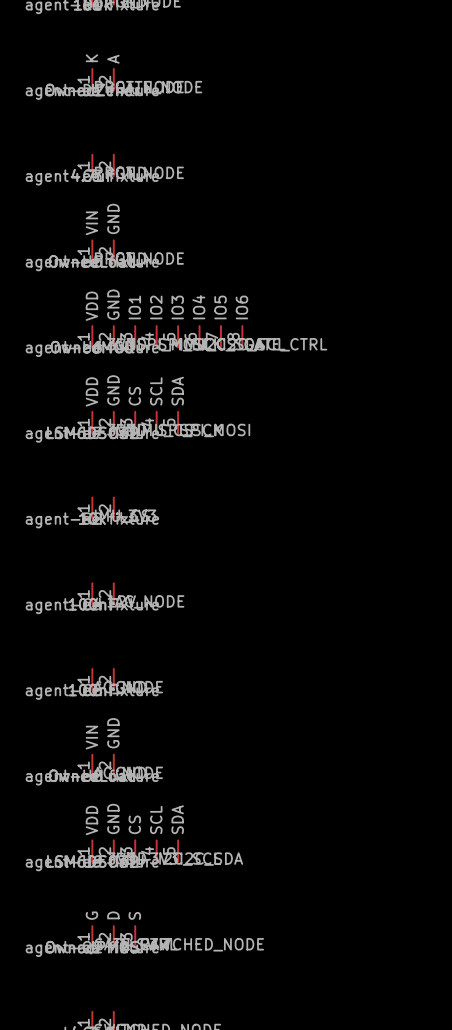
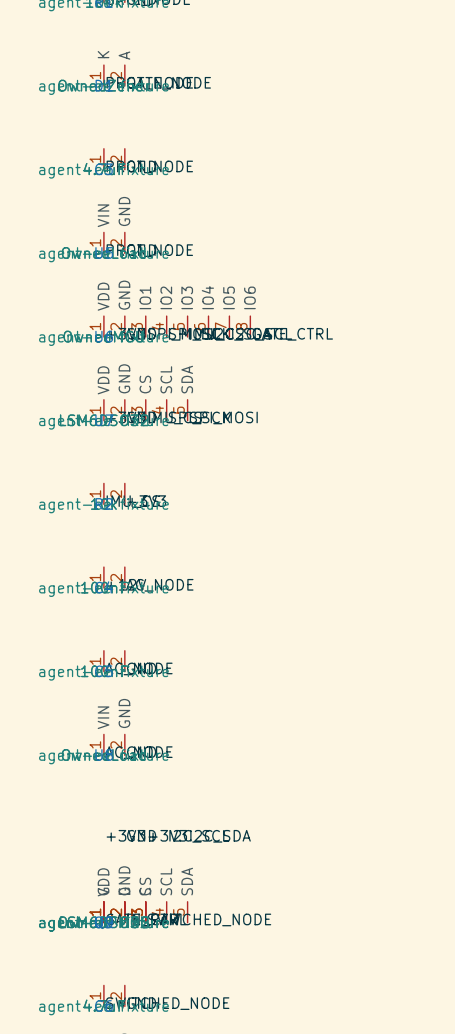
part position: (135, 851) -> (145, 912)

